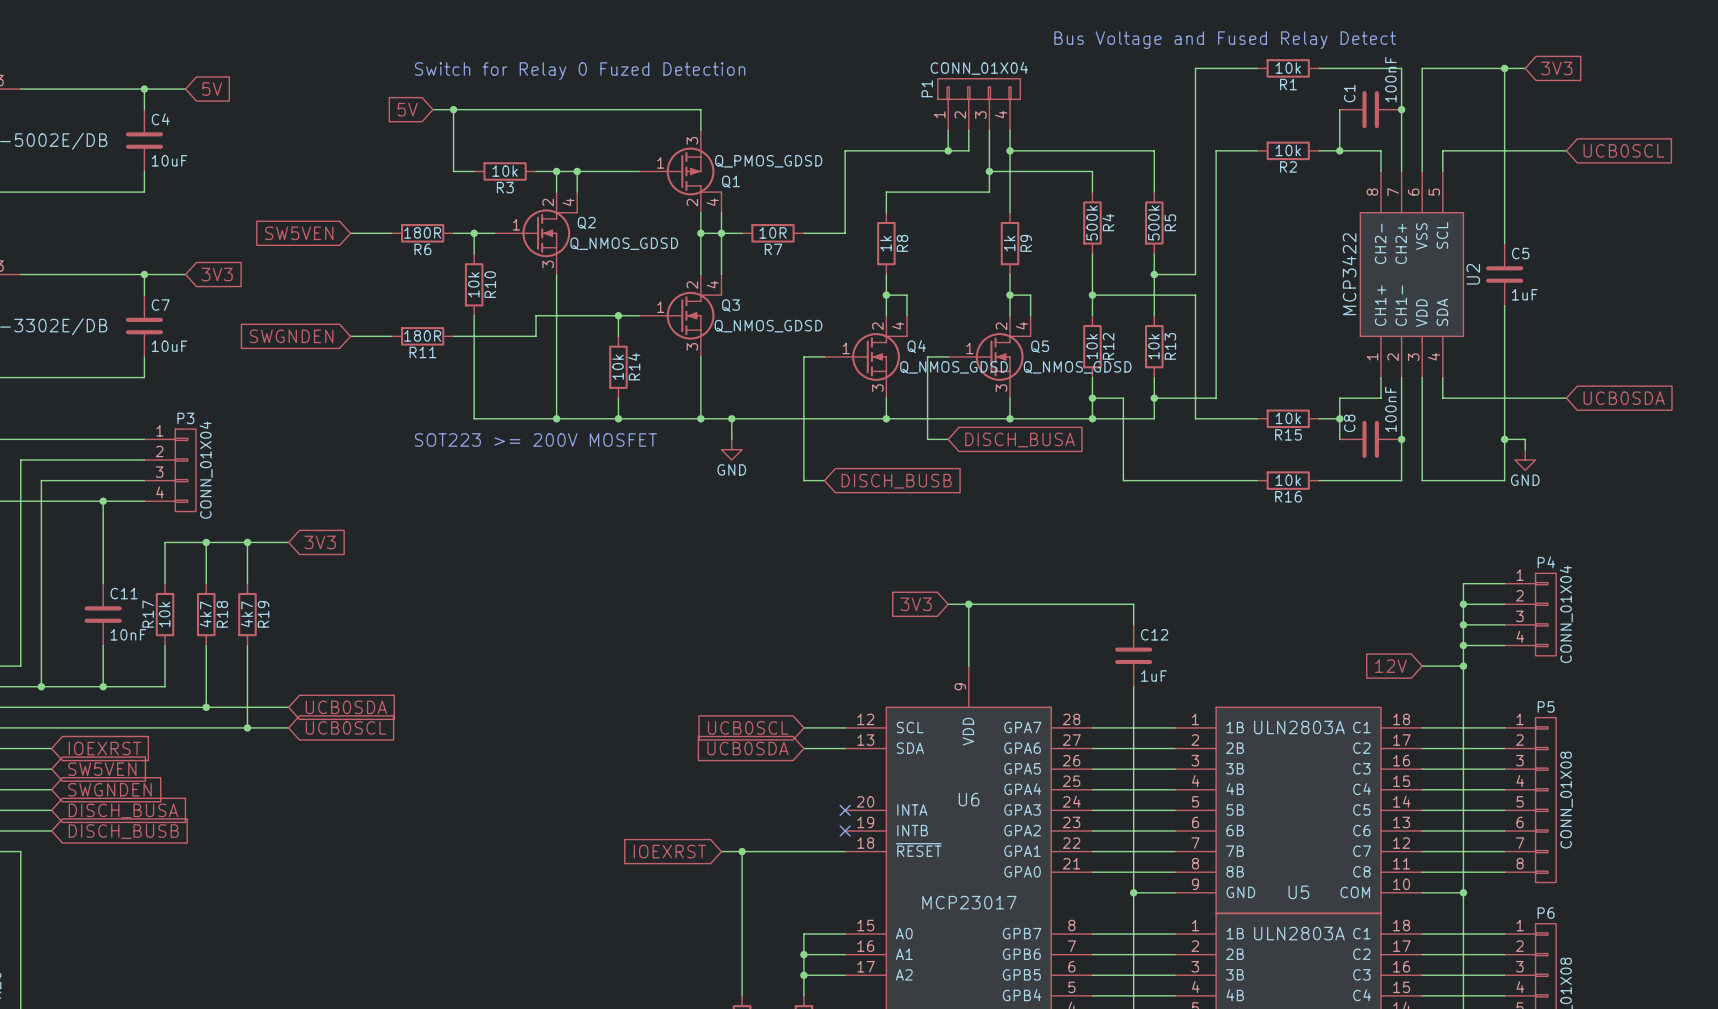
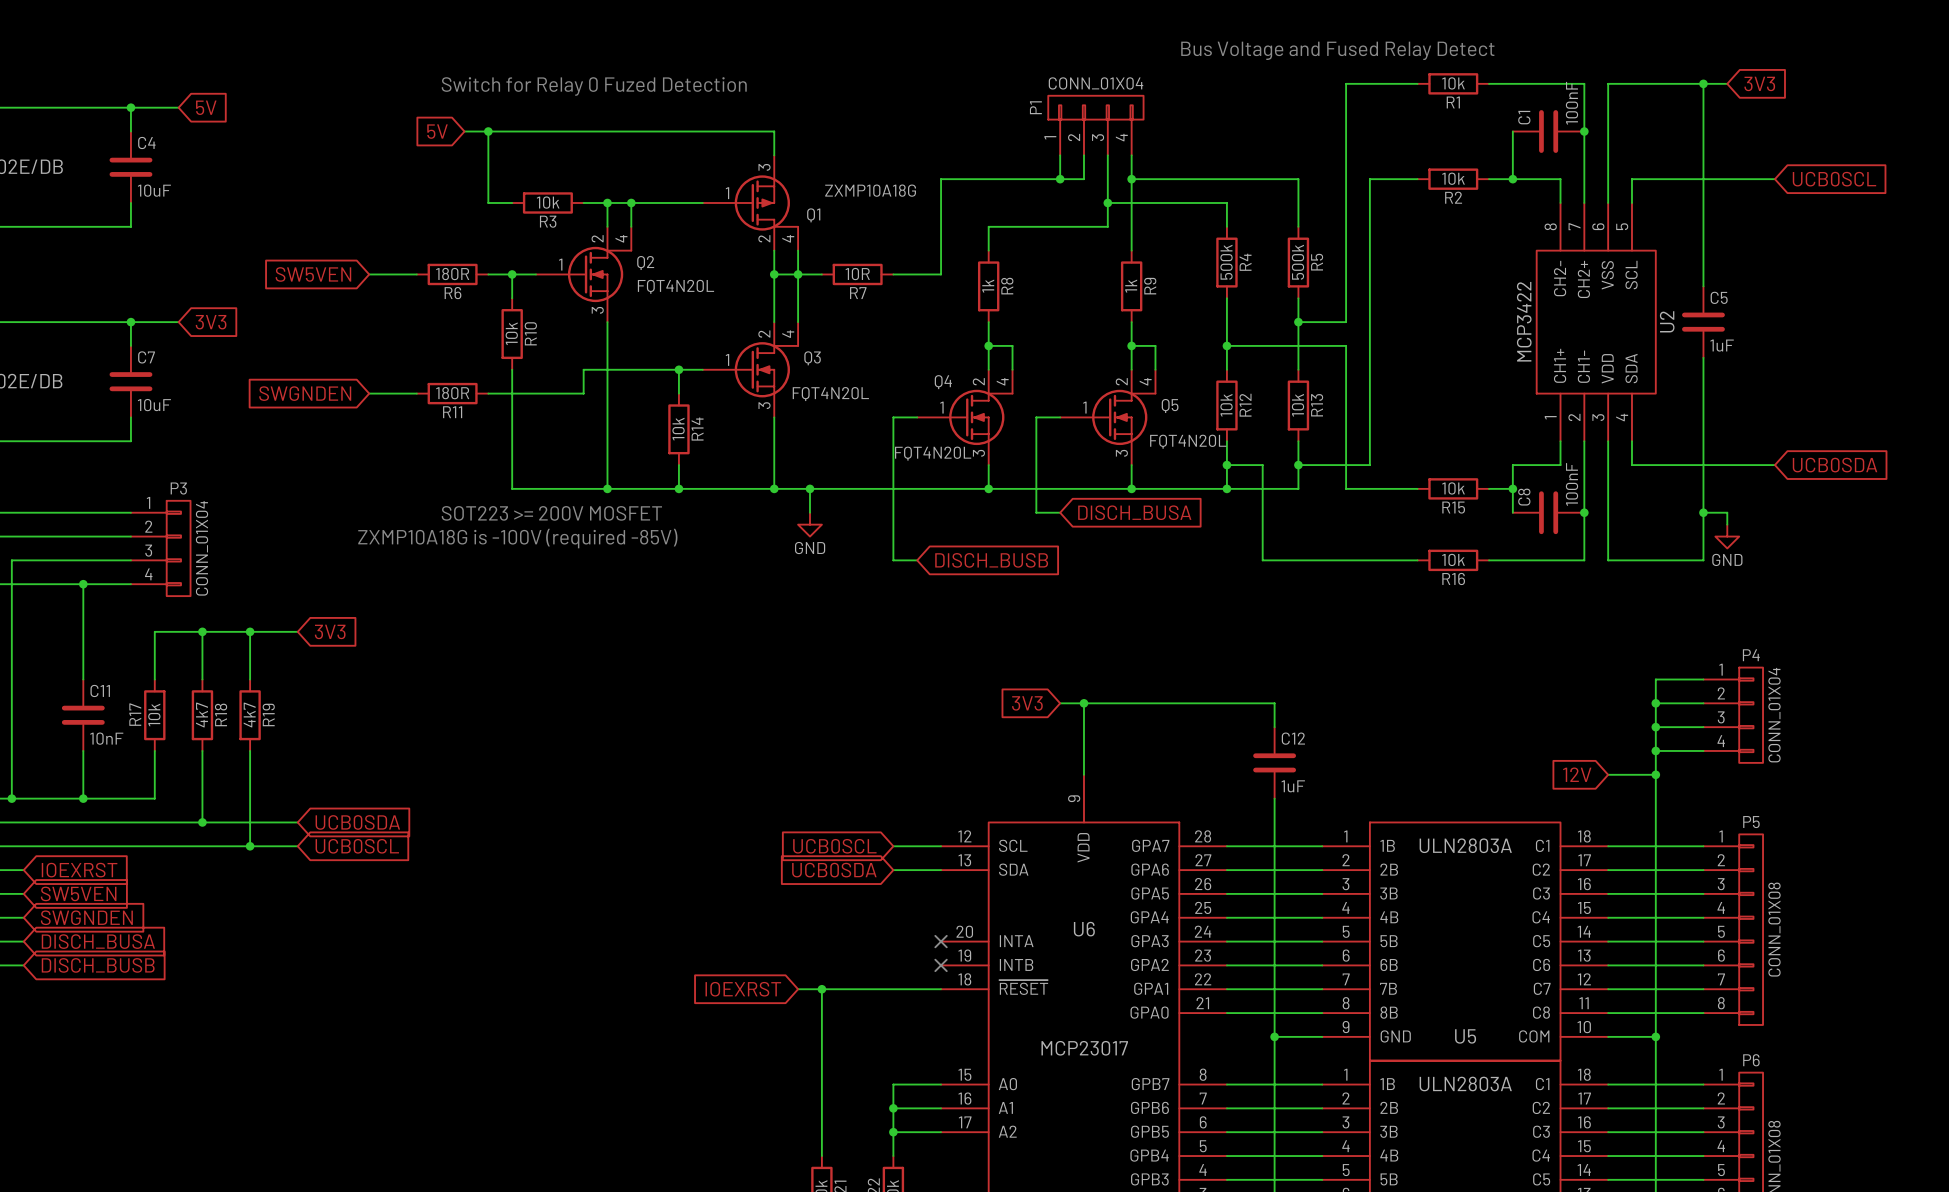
Q1 value: Q_PMOS_GDSD (768, 161) -> ZXMP10A18G (870, 190)
Q2 value: Q_NMOS_GDSD (624, 243) -> FQT4N20L (675, 286)
Q3 value: Q_NMOS_GDSD (768, 326) -> FQT4N20L (830, 394)
Q4 name position: Q4 (916, 346) -> Q4 (943, 382)
Q4 value: Q_NMOS_GDSD (954, 367) -> FQT4N20L (933, 453)
Q5 value: Q_NMOS_GDSD (1077, 367) -> FQT4N20L (1188, 441)
text: none -> ZXMP10A18G is -100V (required -85V) (517, 538)

